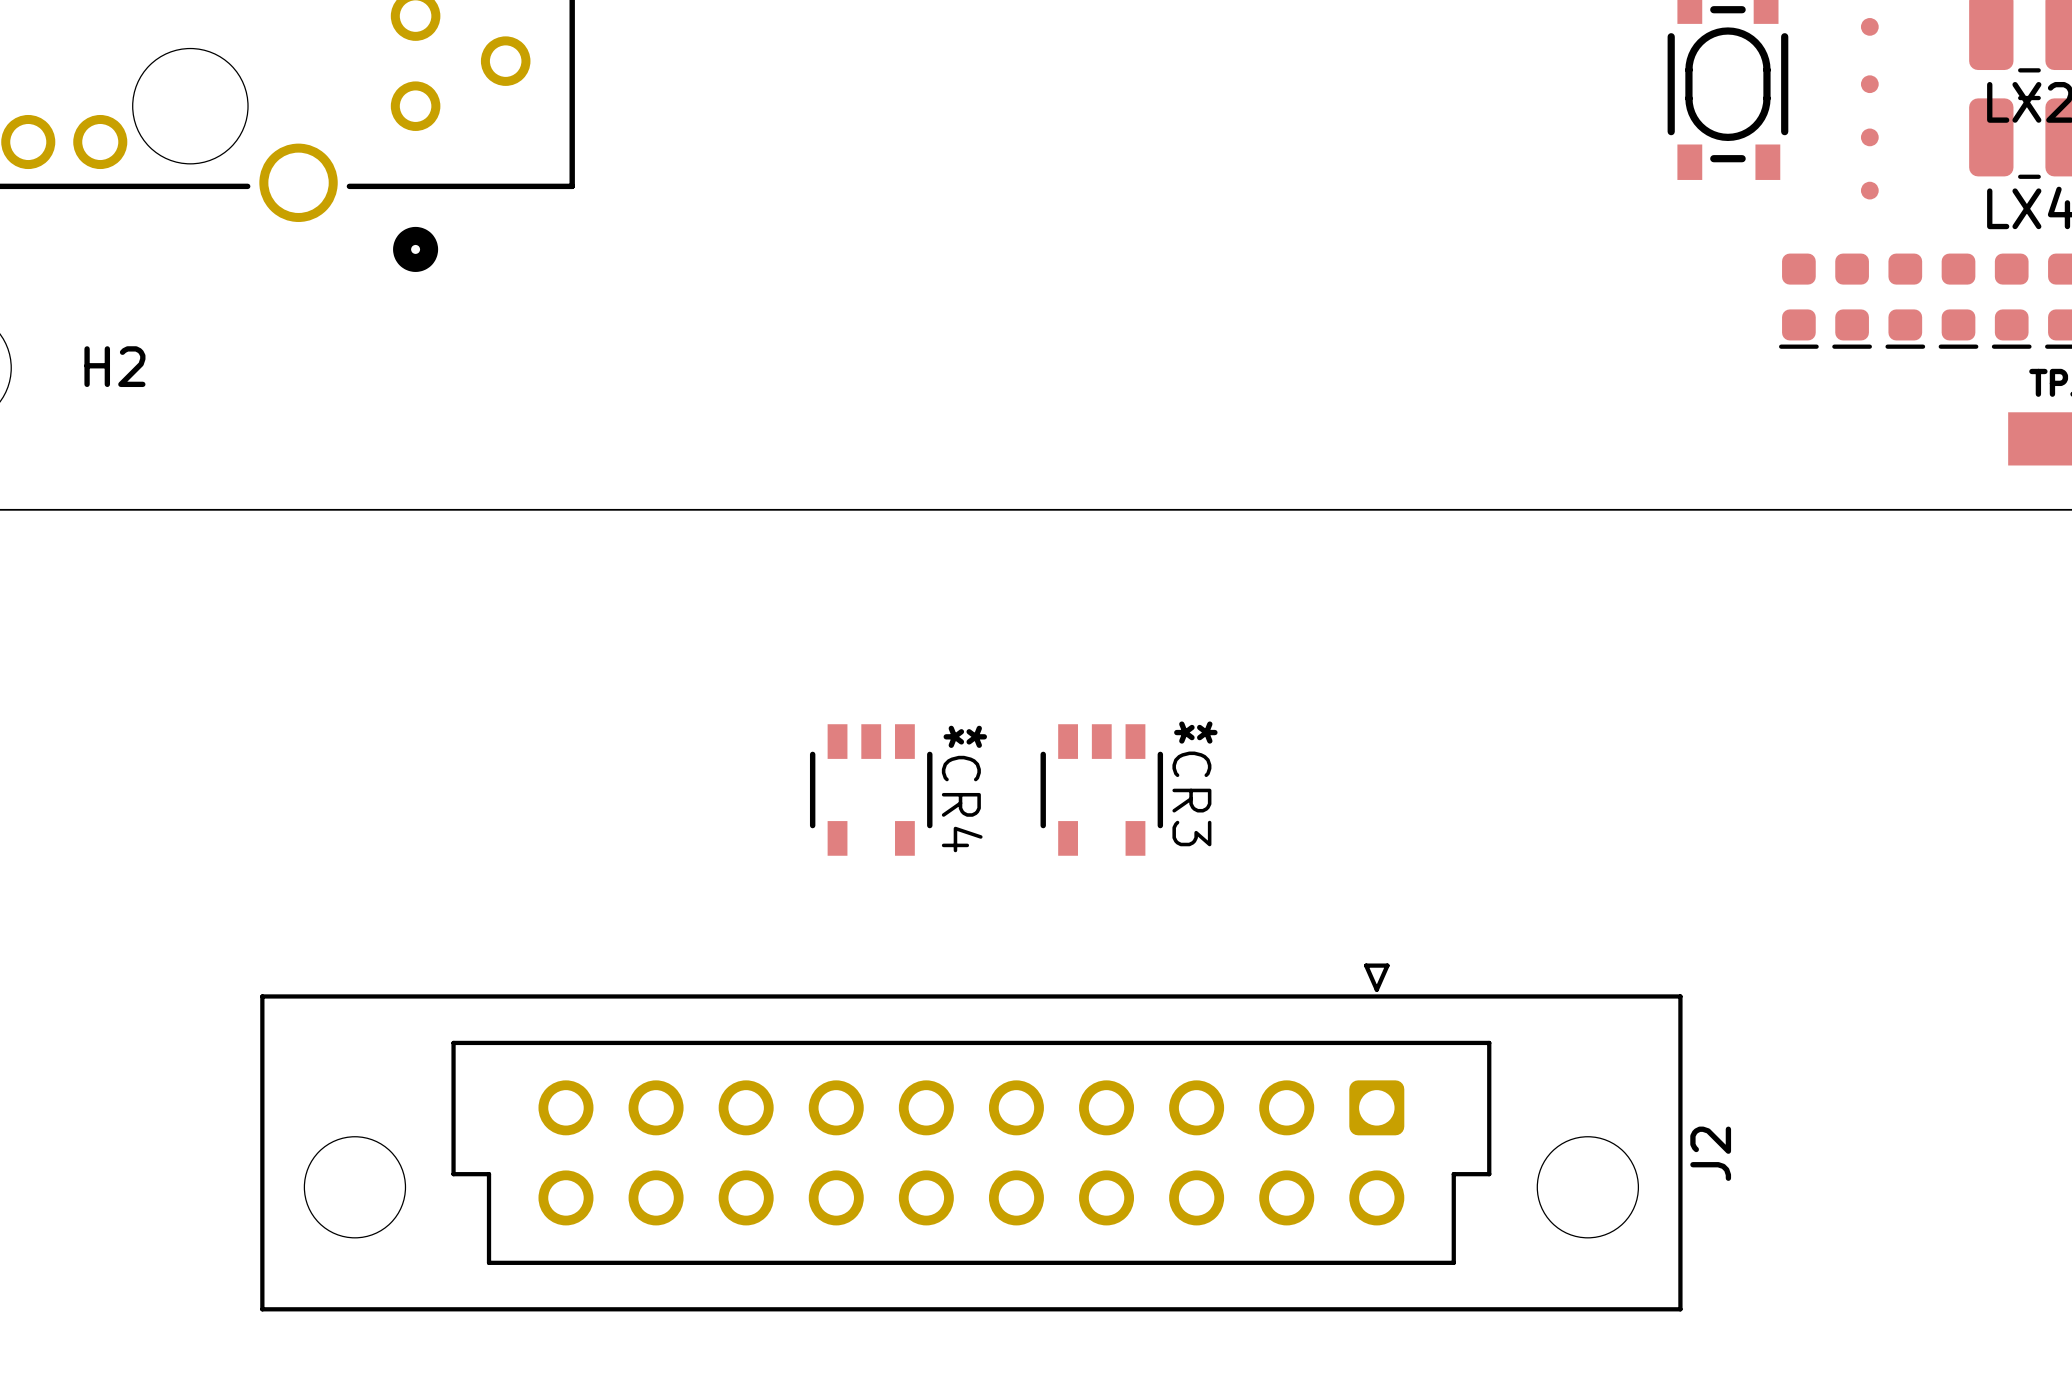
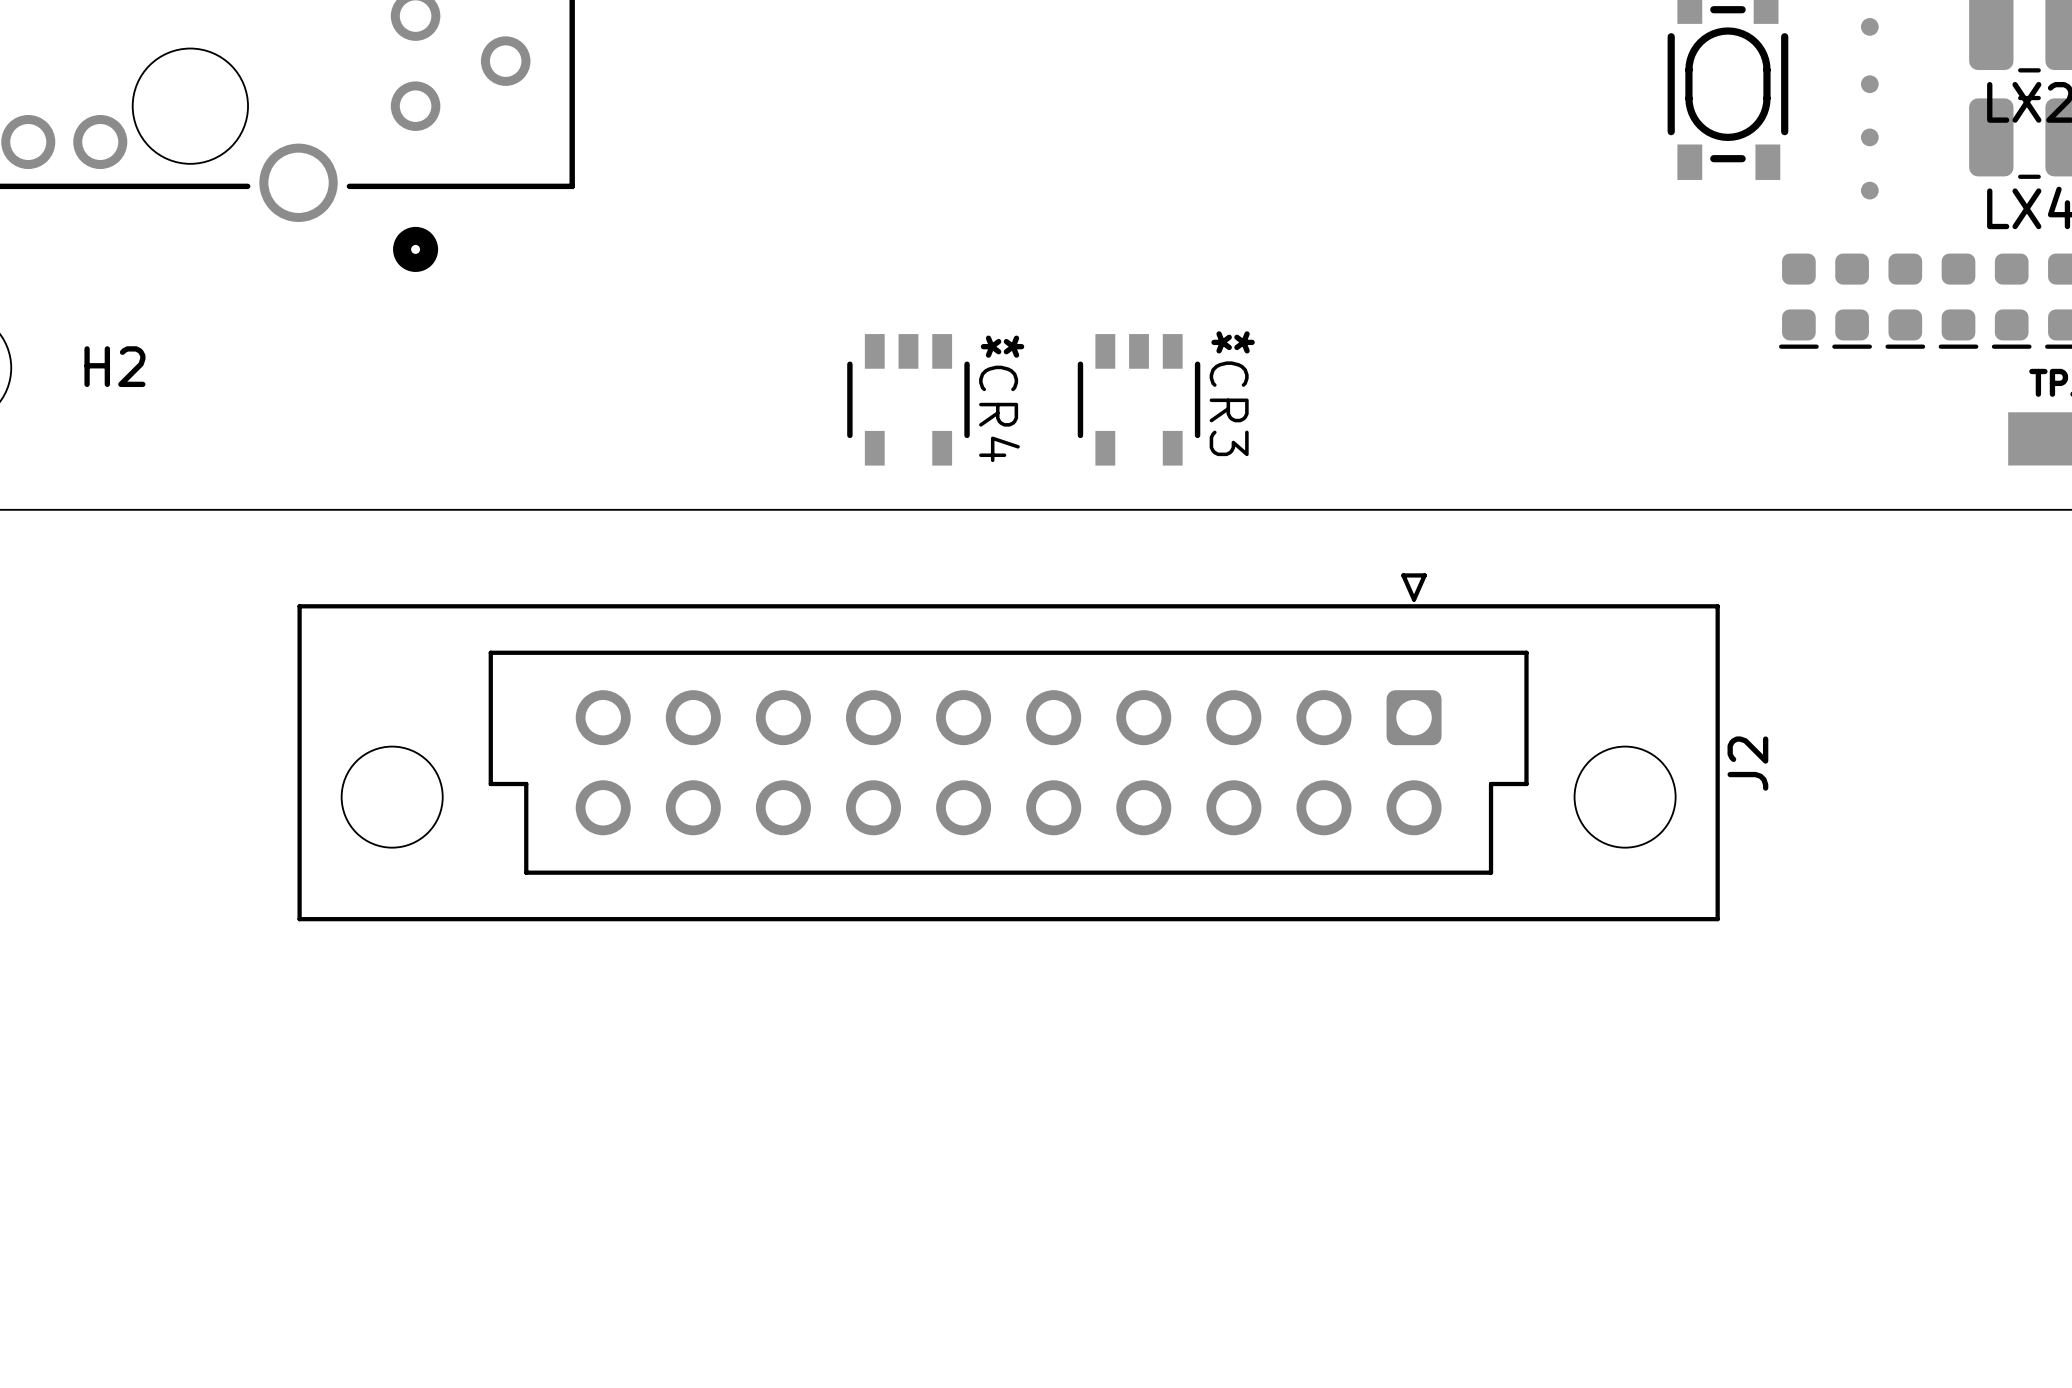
CR4 position: (871, 789) -> (908, 399)
CR3 position: (1101, 789) -> (1139, 399)
J2 position: (971, 1137) -> (1008, 747)

